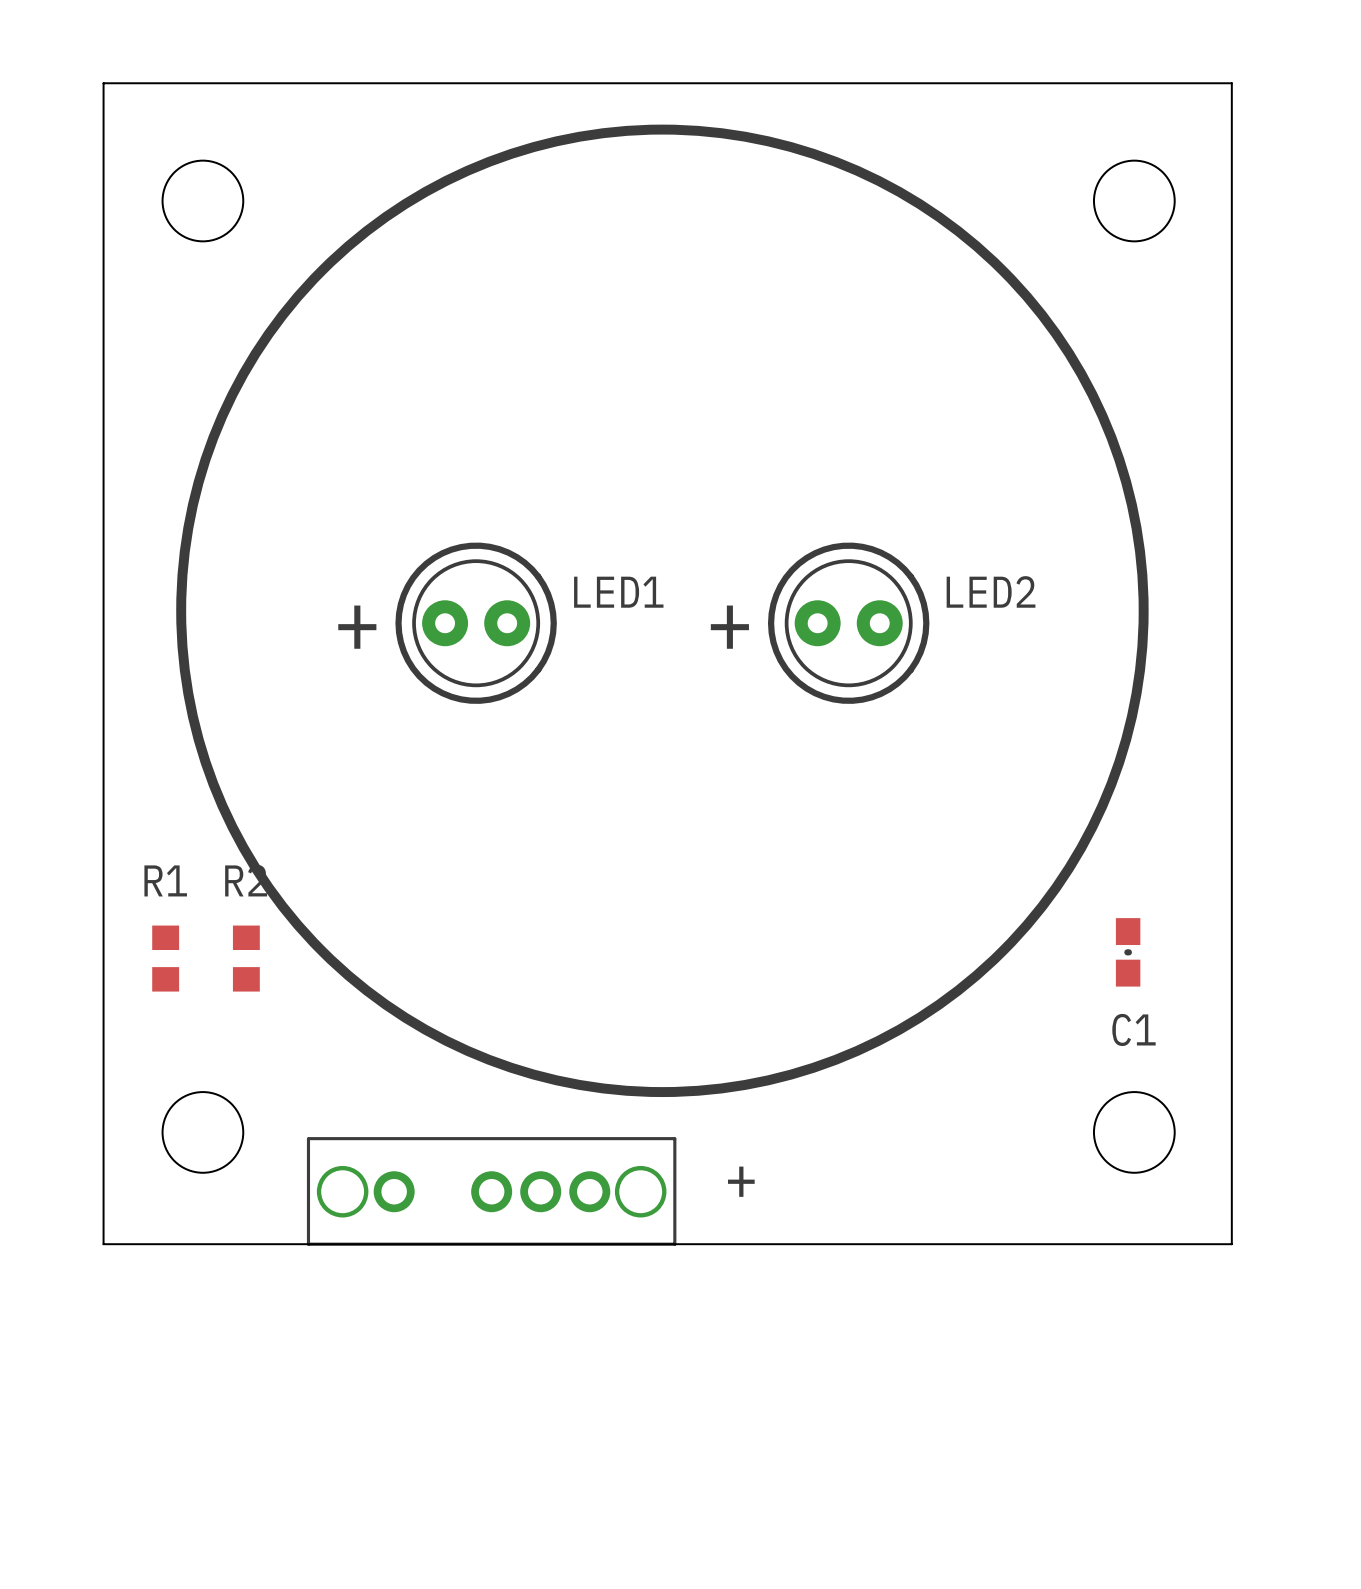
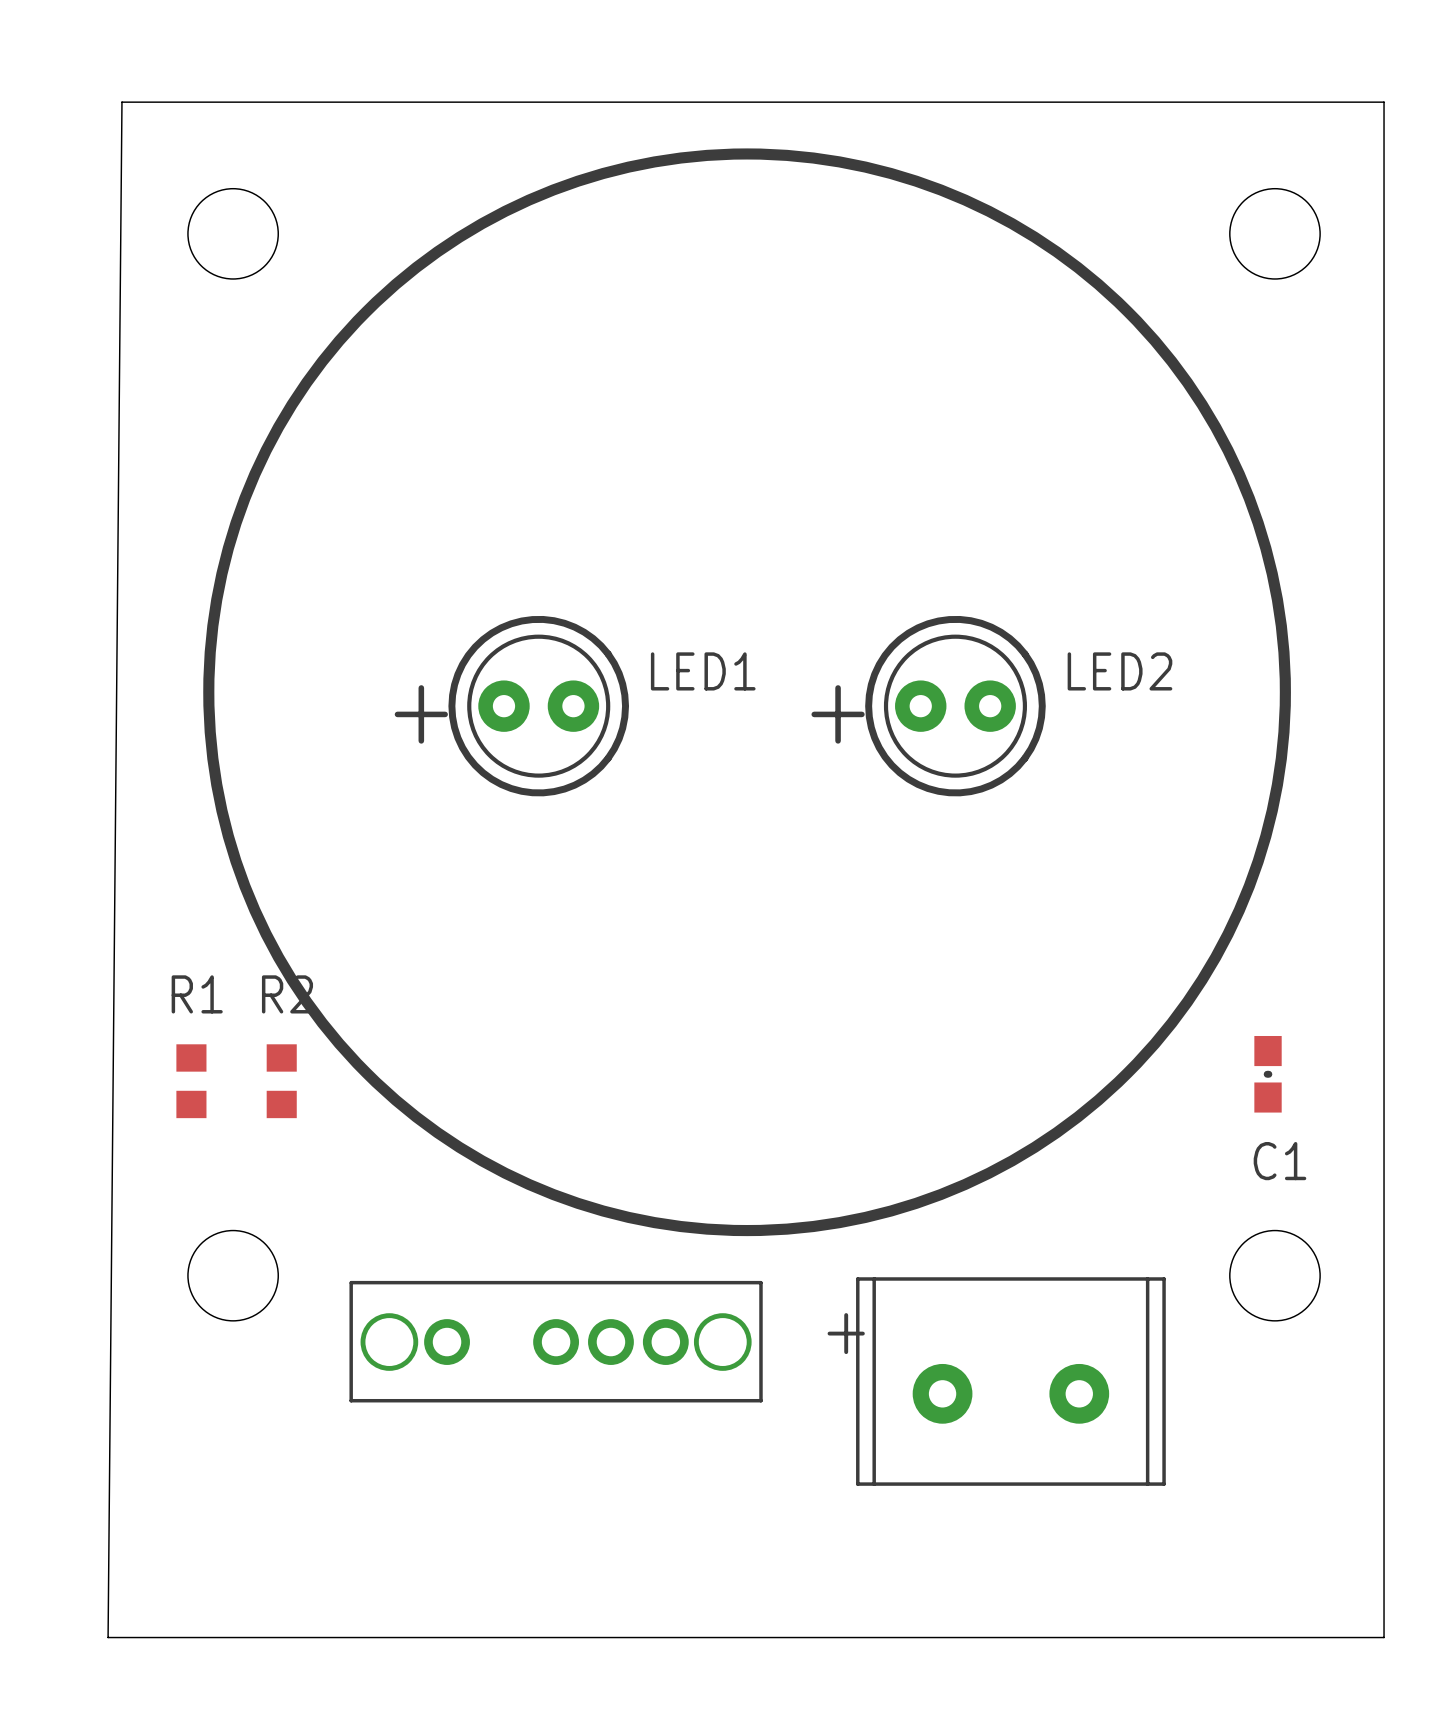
board edge: (103, 83) (103, 1244) (1231, 1244) -> (121, 102) (108, 1637) (1384, 1637) (1384, 1400)
part: none -> (1010, 1381)

